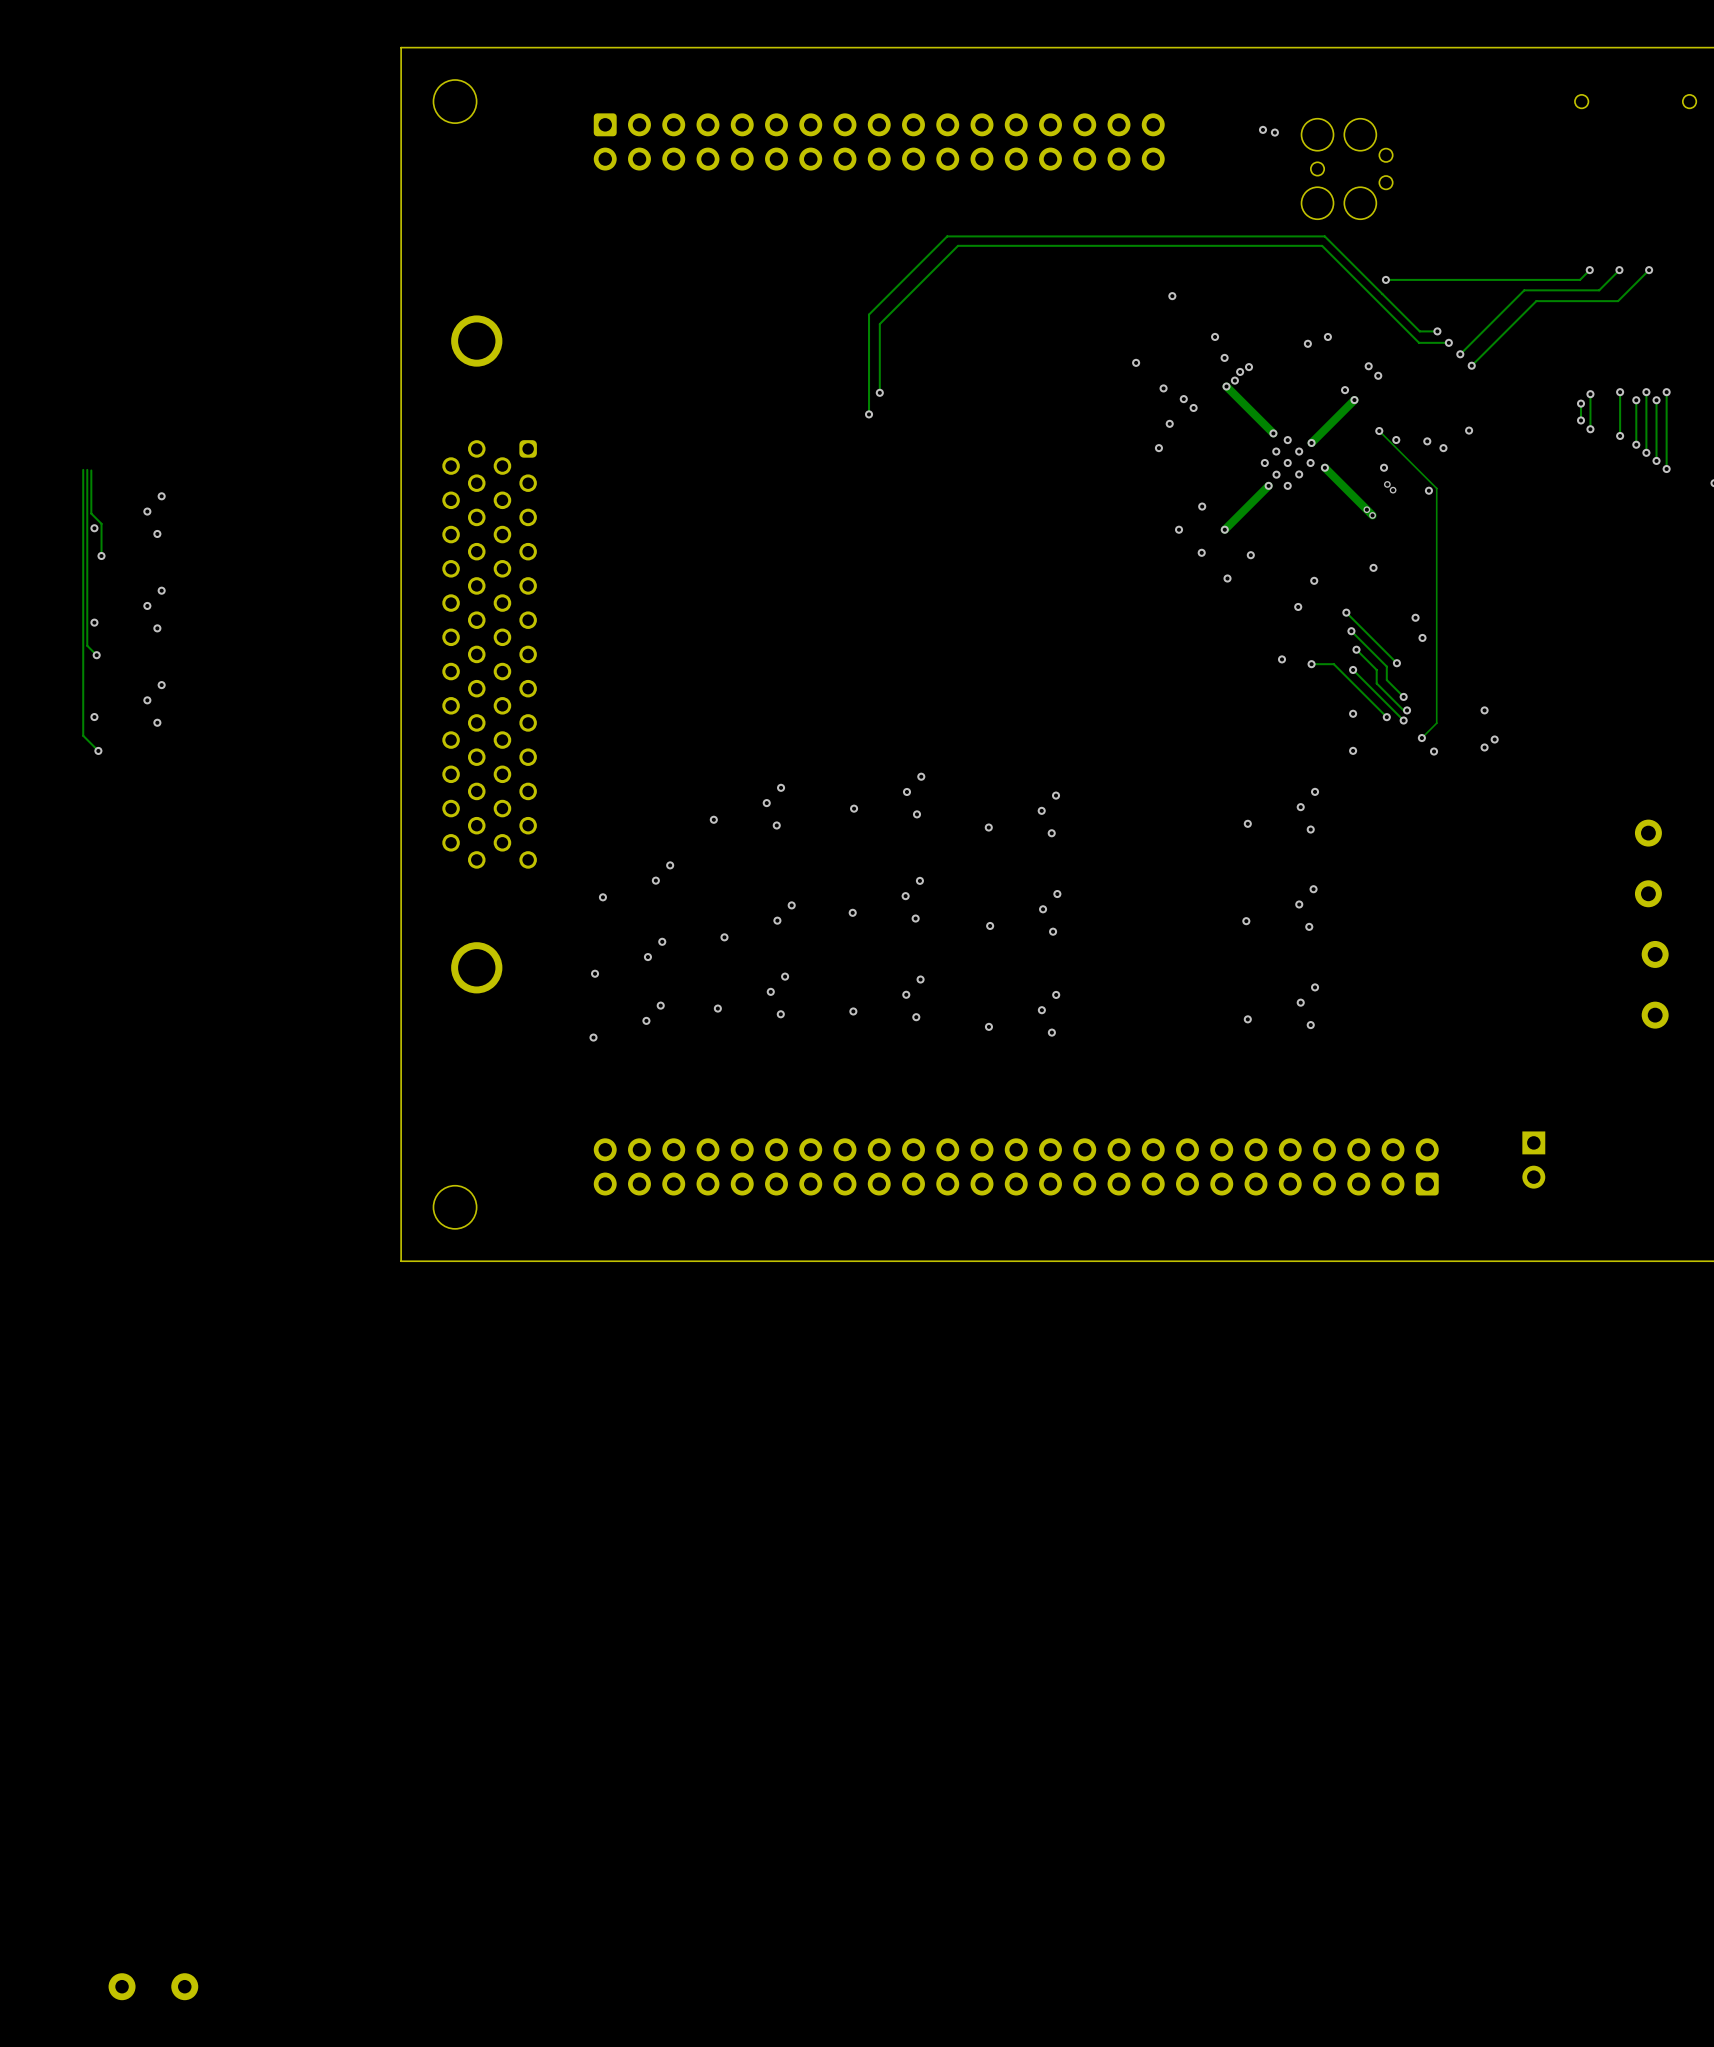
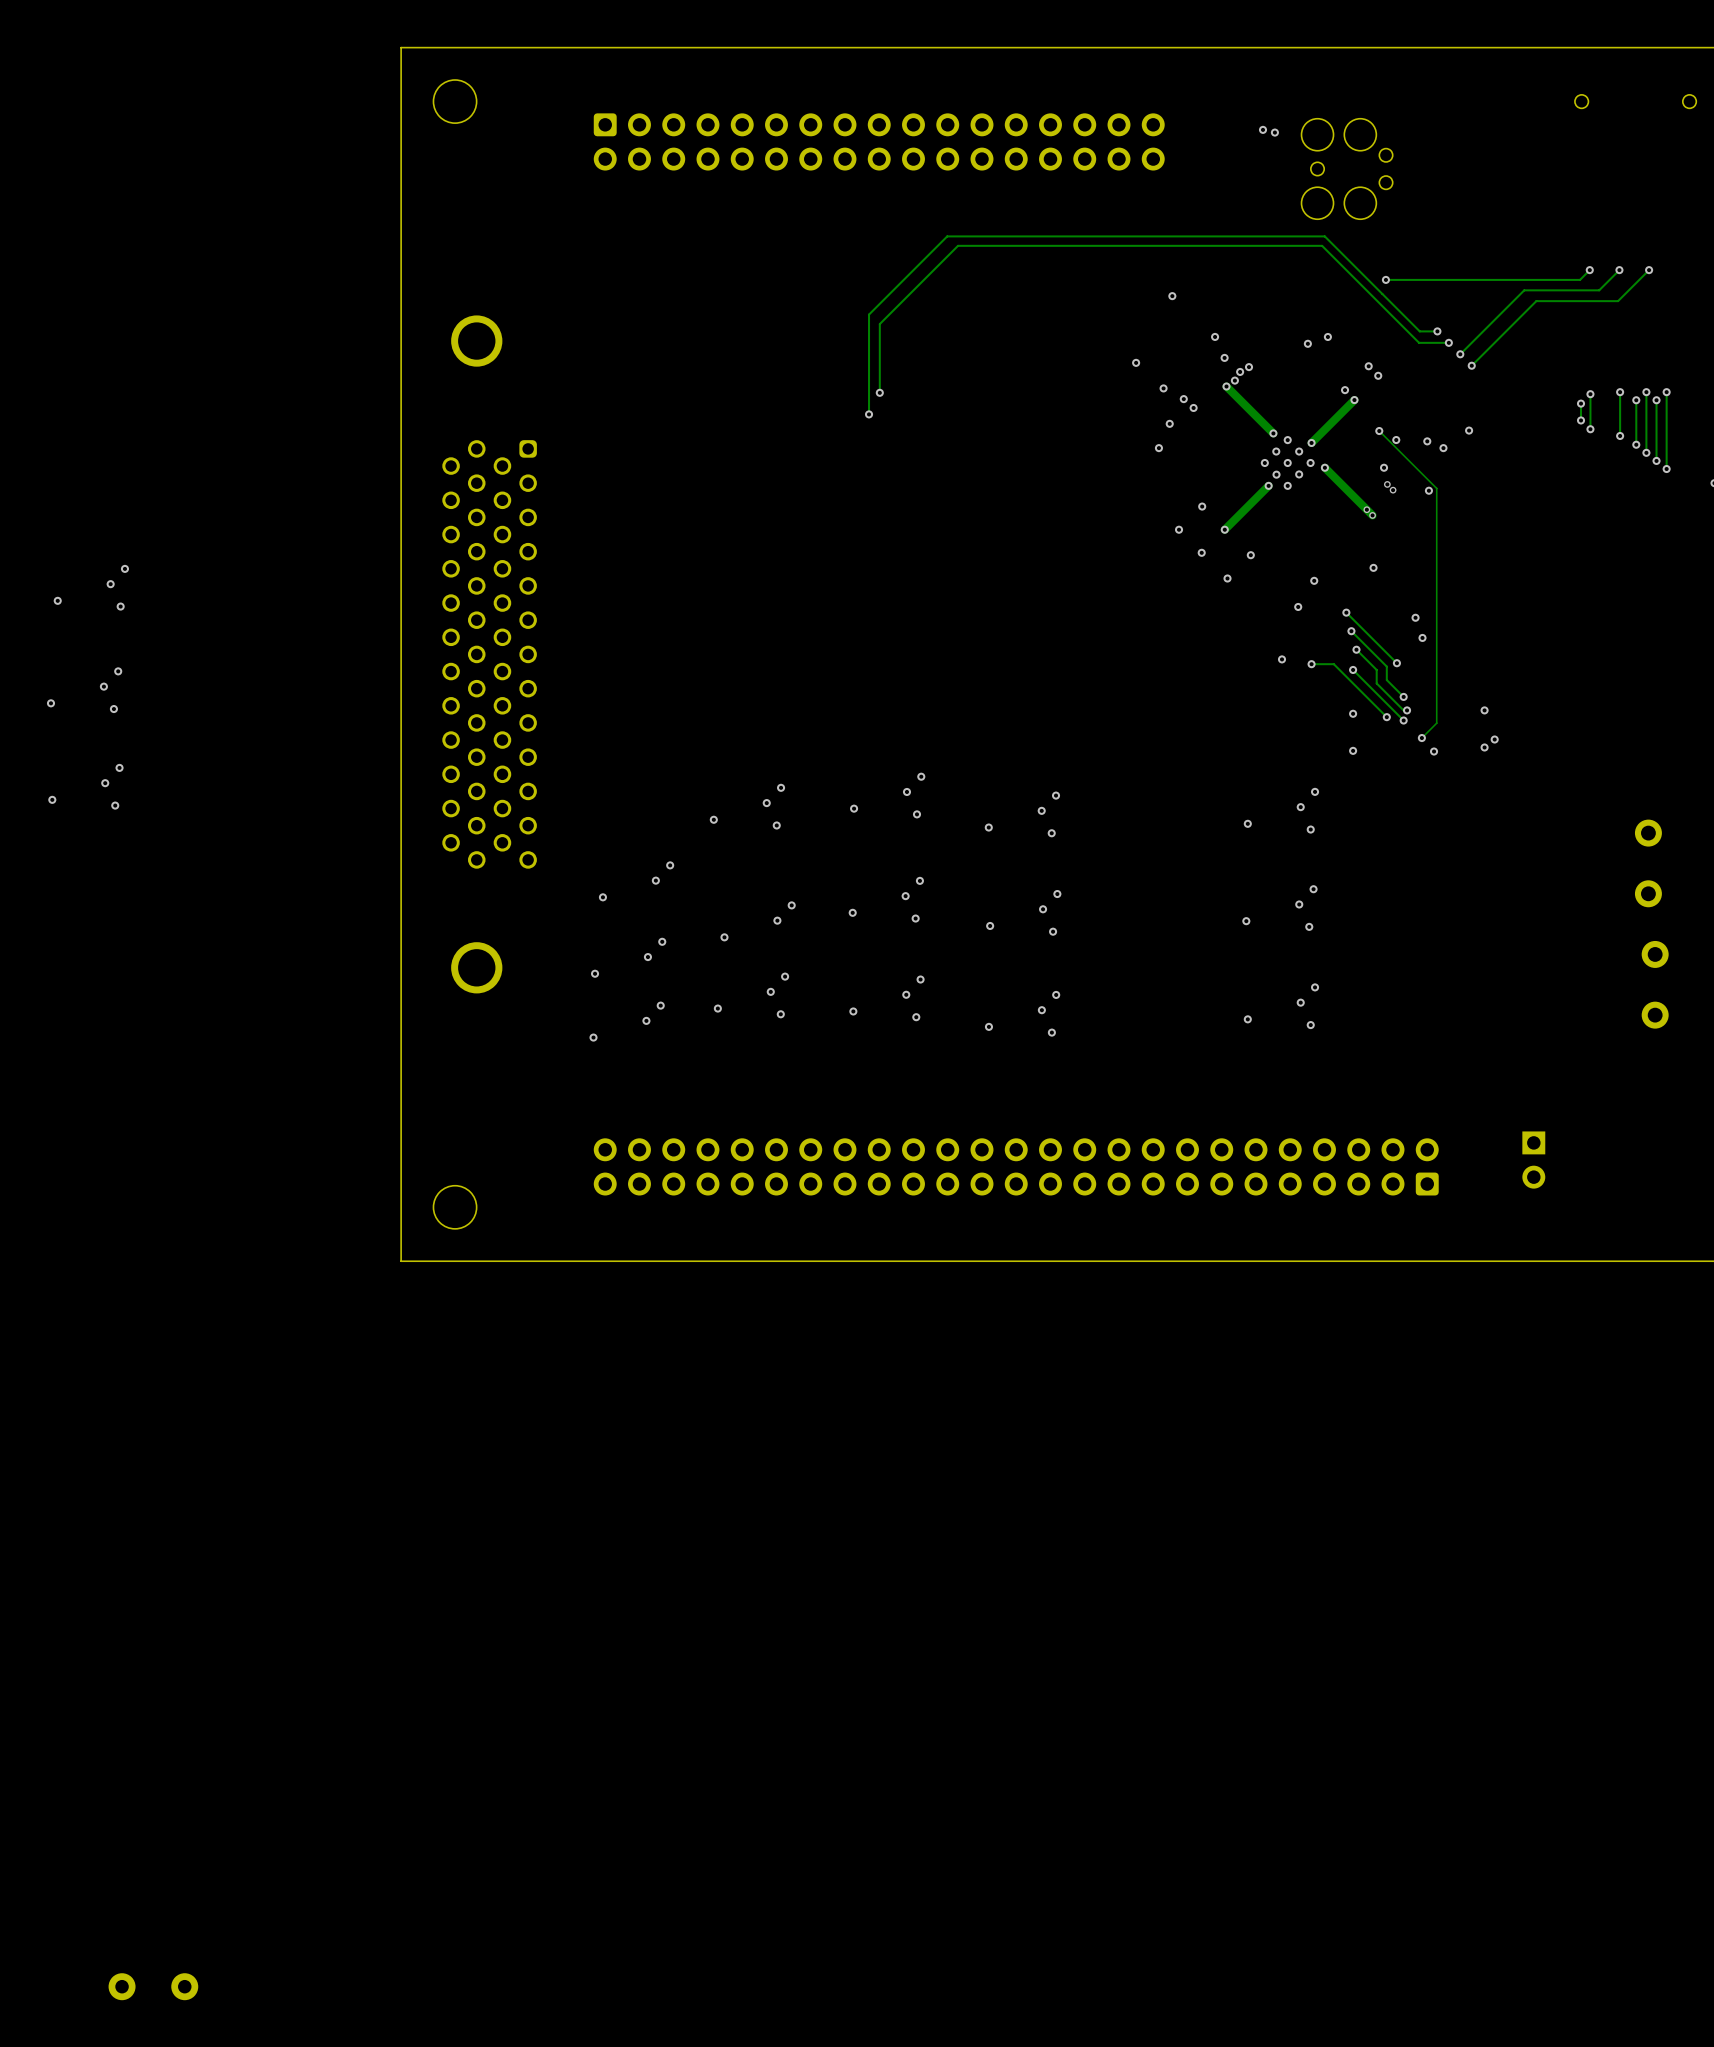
track: (83, 469) (83, 735) (98, 750) -> none
track: (87, 469) (87, 645) (96, 655) -> none
track: (91, 470) (91, 513) (101, 523) (102, 555) -> none
via: (161, 496) -> none
via: (147, 511) -> none
via: (94, 528) -> none
via: (157, 533) -> none
via: (101, 555) -> none
via: none -> (124, 568)
via: none -> (110, 584)
via: (161, 590) -> none
via: none -> (57, 600)
via: (147, 605) -> none
via: none -> (120, 606)
via: (94, 622) -> none
via: (157, 628) -> none
via: (96, 655) -> none
via: none -> (118, 671)
via: (161, 685) -> none
via: none -> (103, 686)
via: (147, 700) -> none
via: none -> (50, 703)
via: none -> (113, 709)
via: (94, 717) -> none
via: (157, 722) -> none
via: (98, 750) -> none
via: none -> (119, 767)
via: none -> (105, 783)
via: none -> (52, 799)
via: none -> (115, 805)

